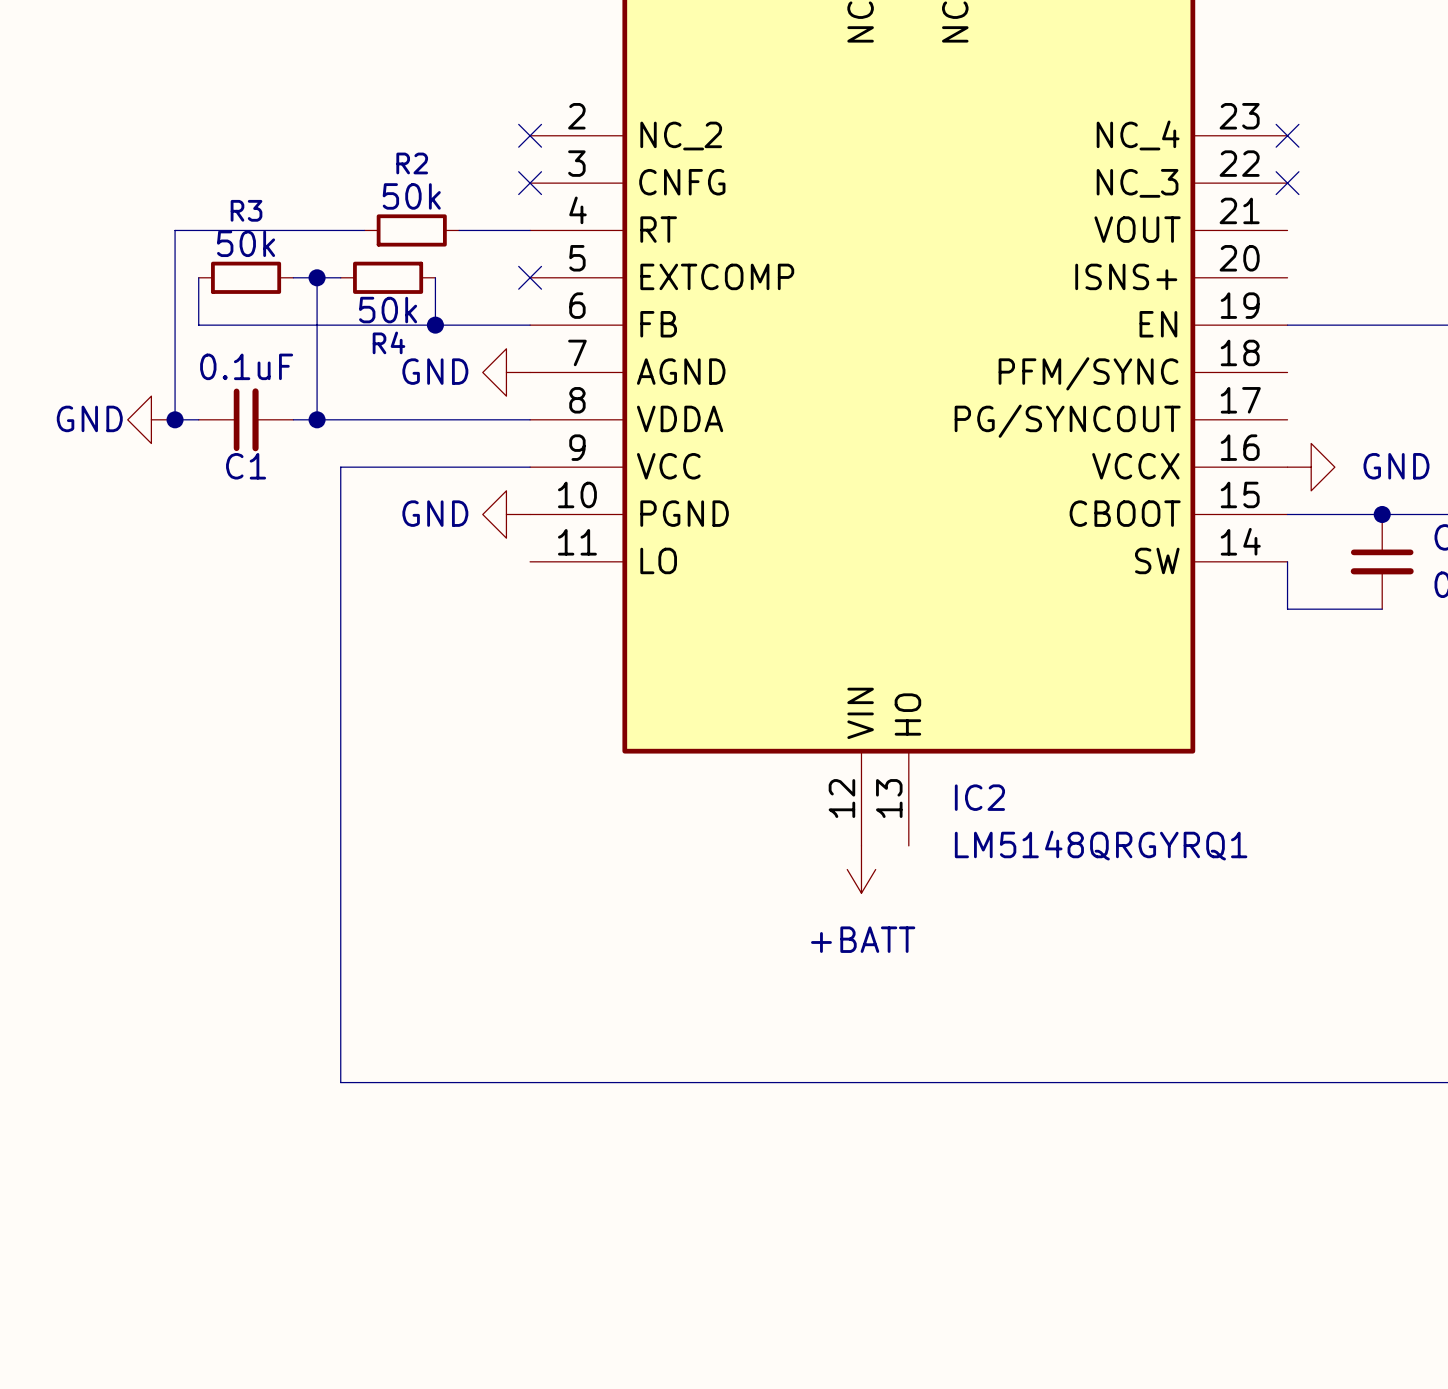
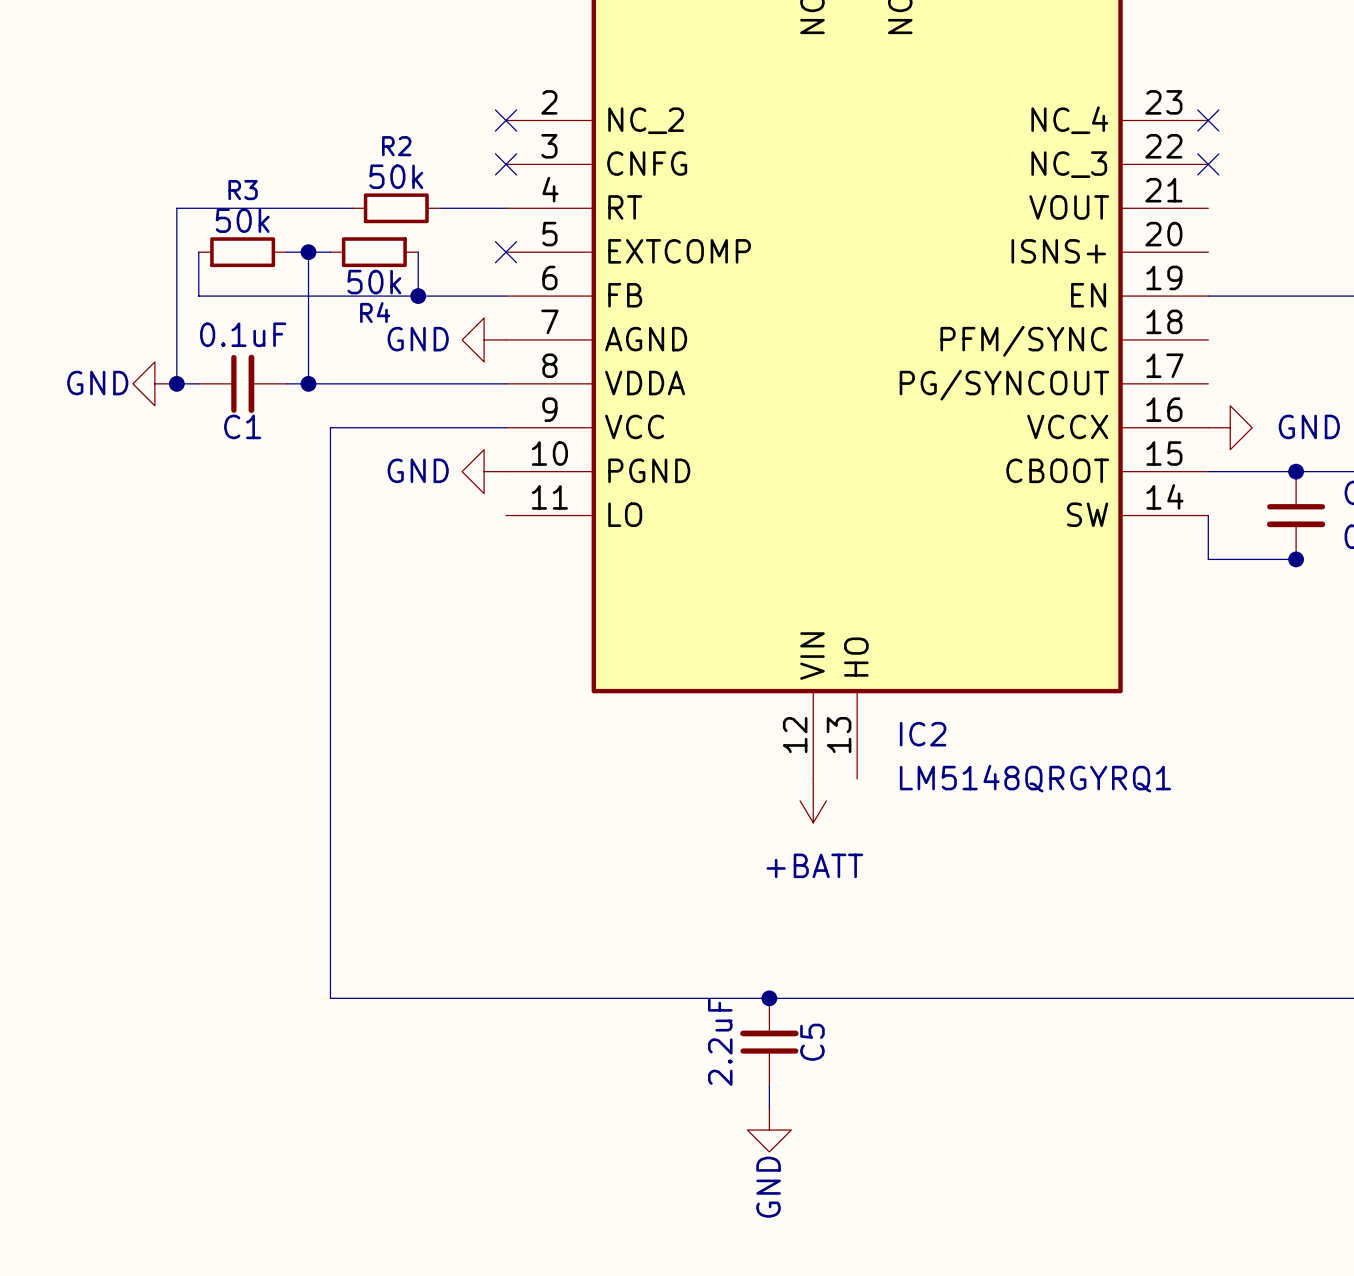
junction: none -> (1296, 559)
junction: none -> (769, 998)
C5: none -> 2.2uF (769, 1042)
wire: none -> (769, 1086) (769, 1108)
power symbol: none -> GND (769, 1130)

